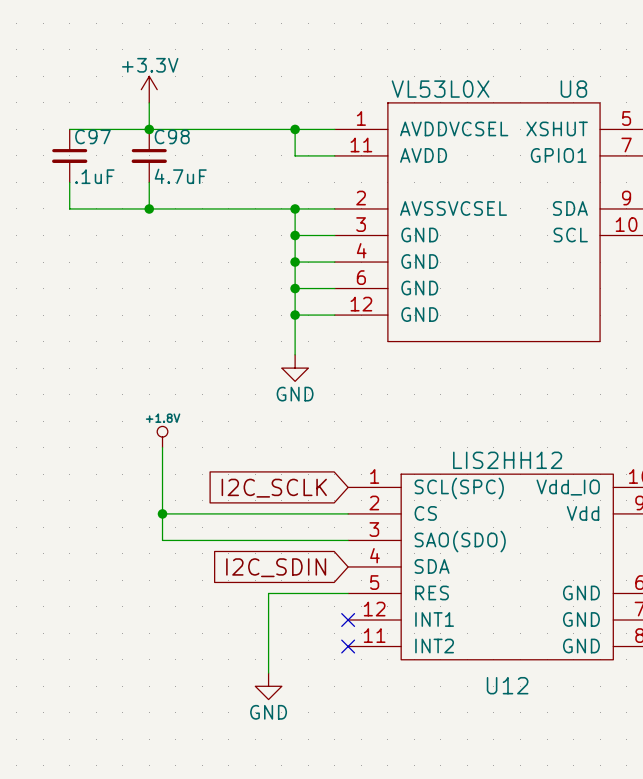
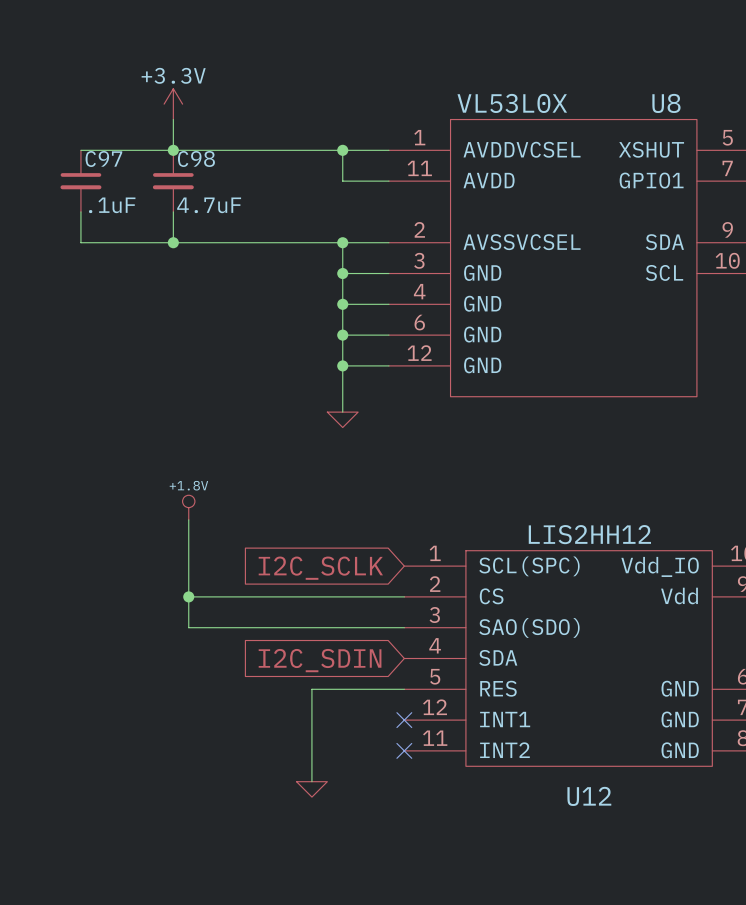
power symbol shape: [281, 354, 309, 382] -> [327, 412, 359, 428]
power symbol text: GND (295, 394) -> none
power symbol shape: [255, 673, 282, 700] -> [296, 781, 328, 798]
power symbol text: GND (268, 712) -> none

